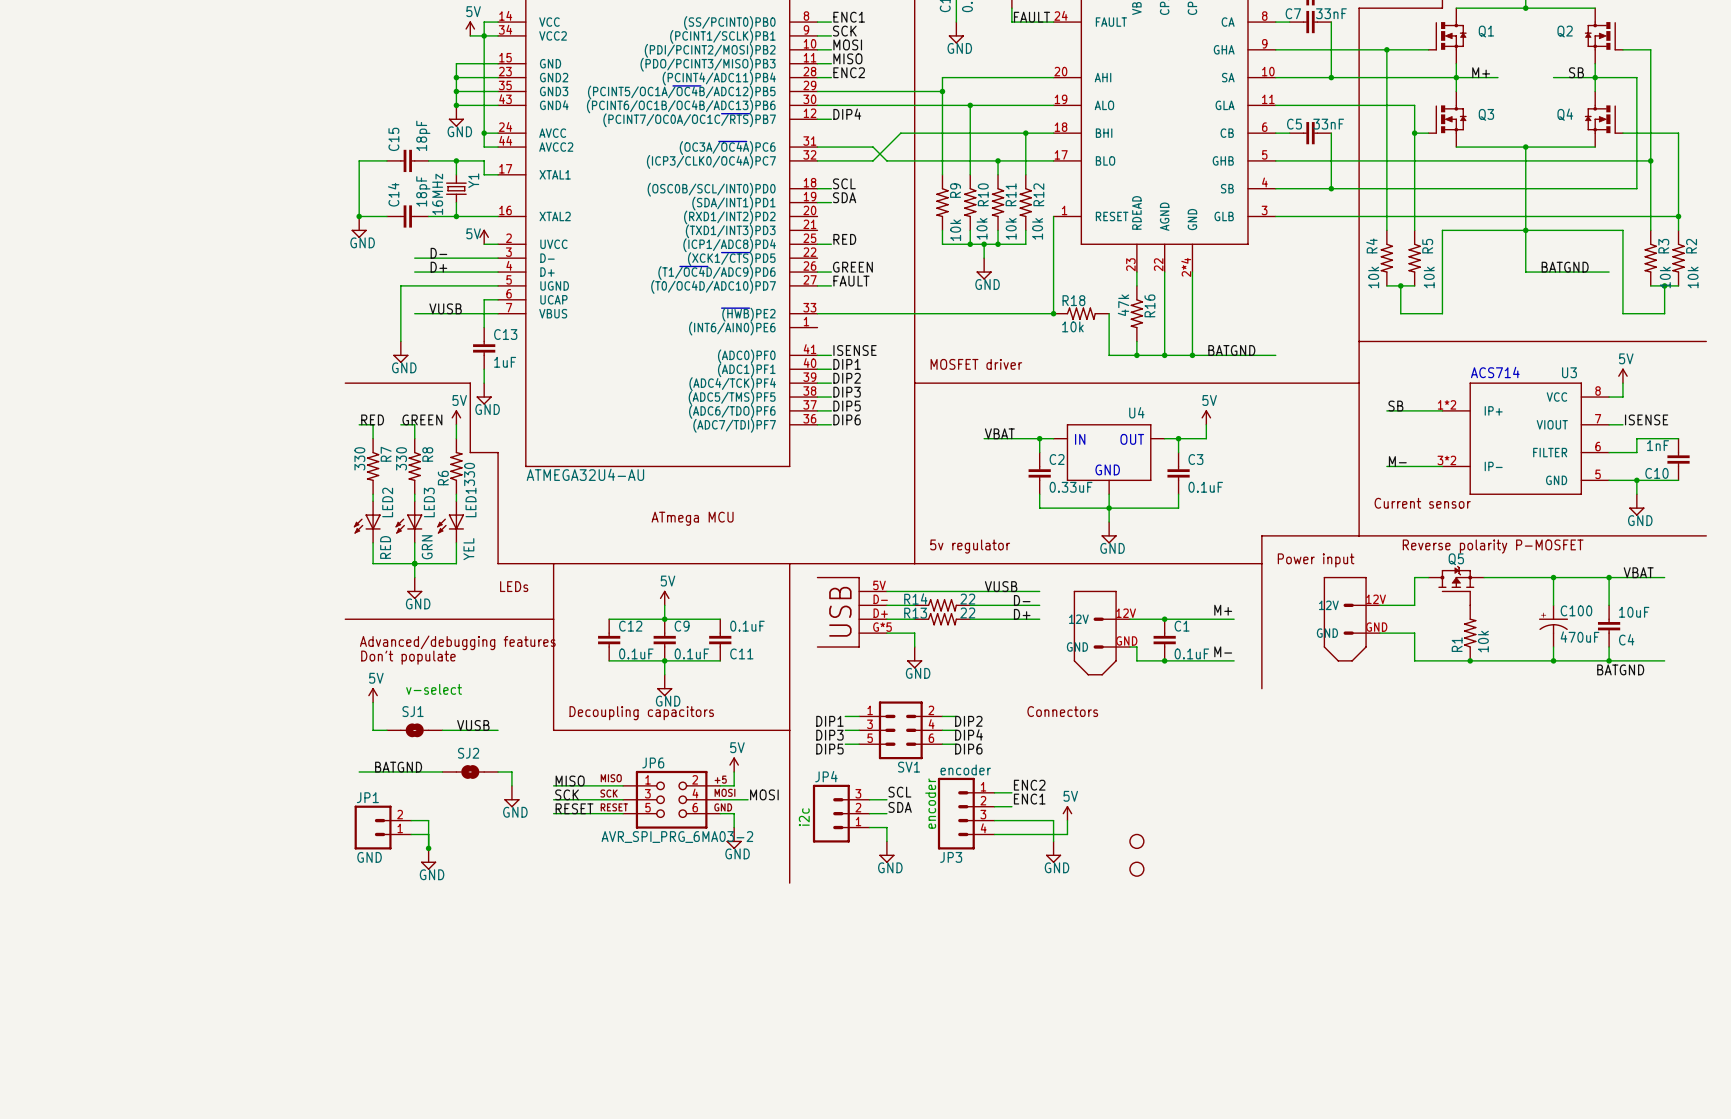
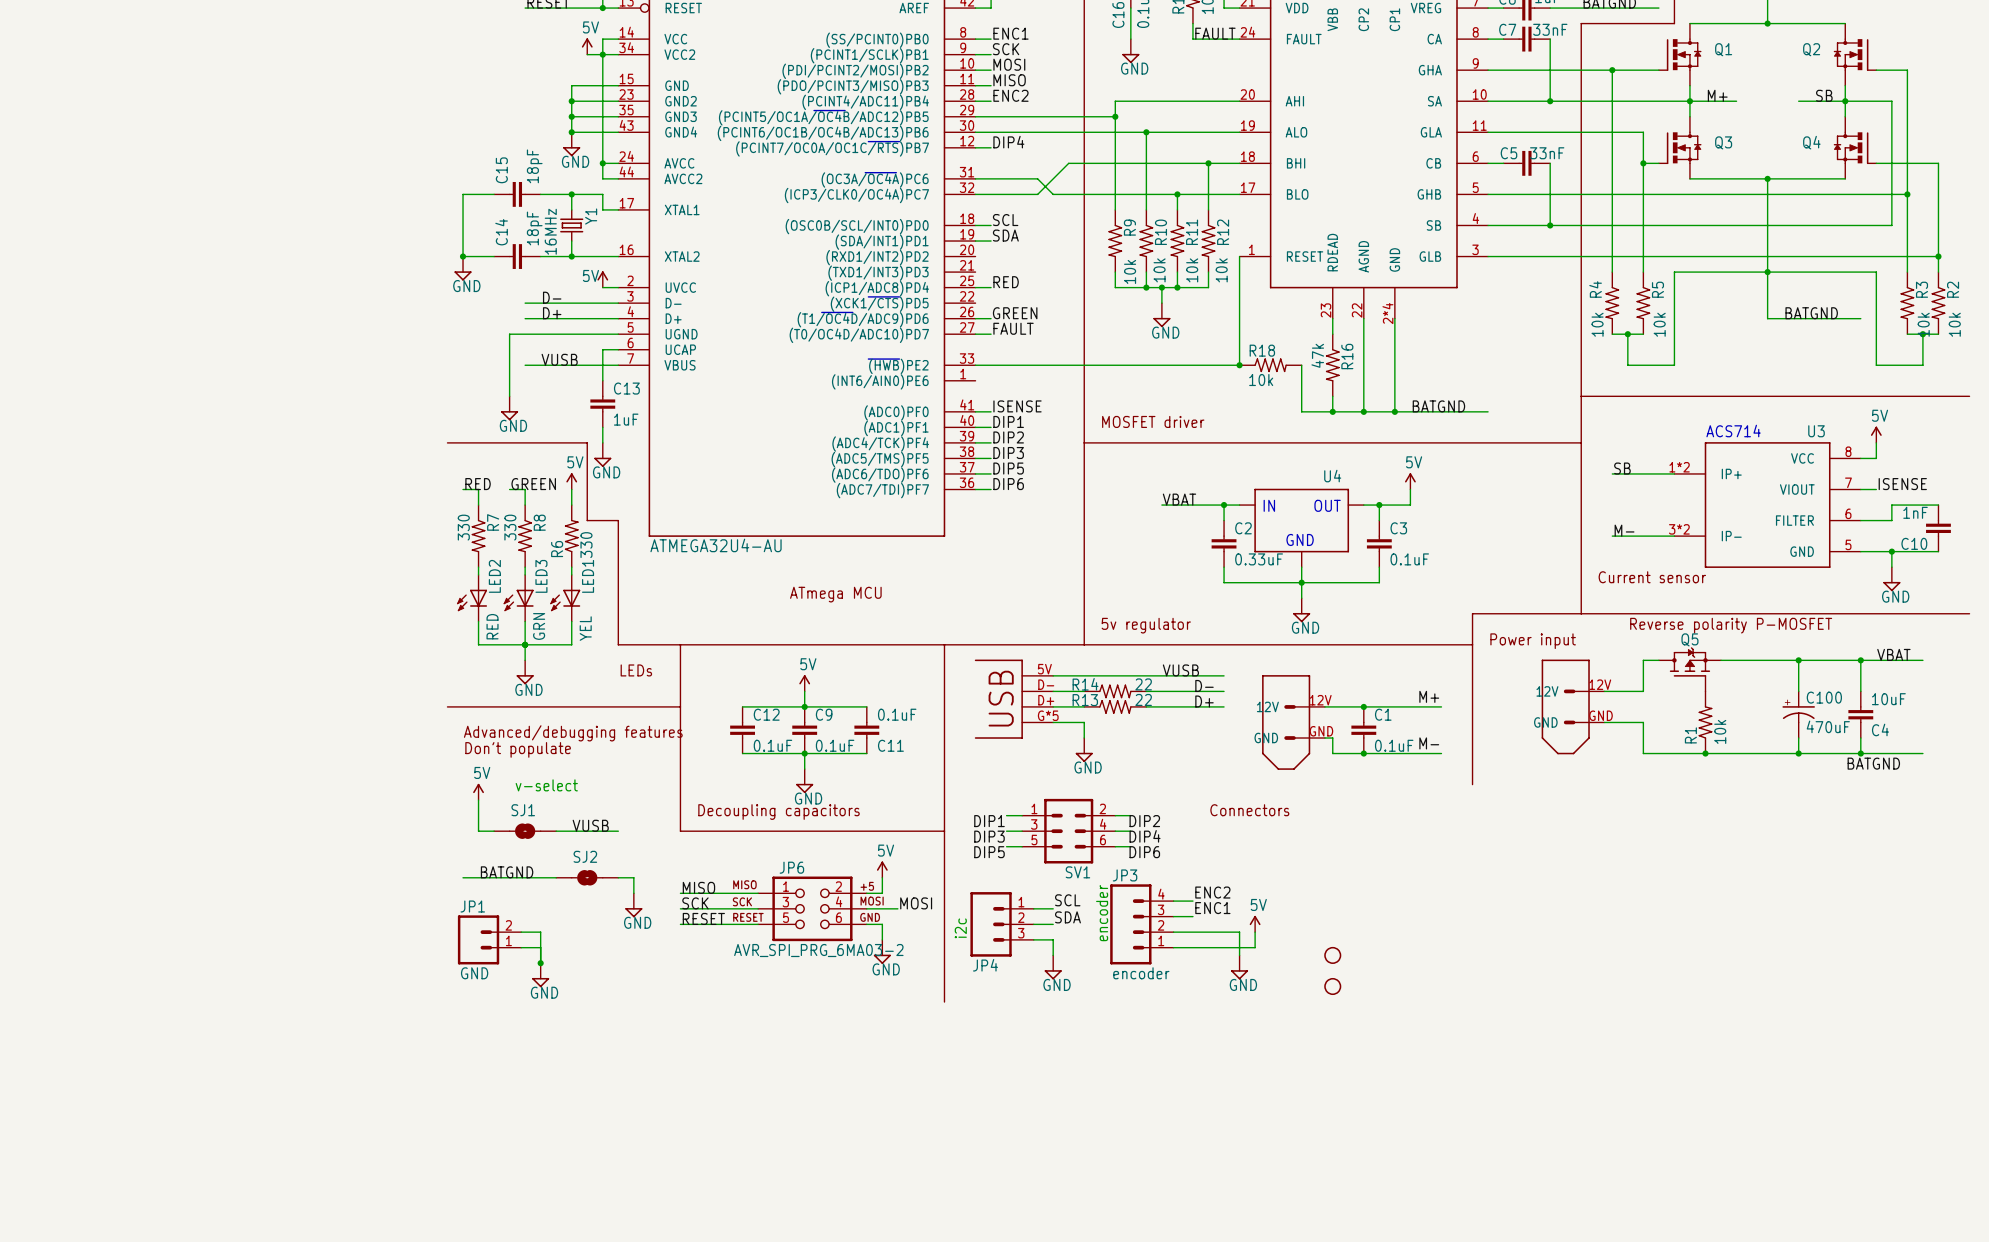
JP4 flip: as is (831, 813) -> up-down (991, 924)
JP3 flip: as is (956, 813) -> up-down (1130, 924)

